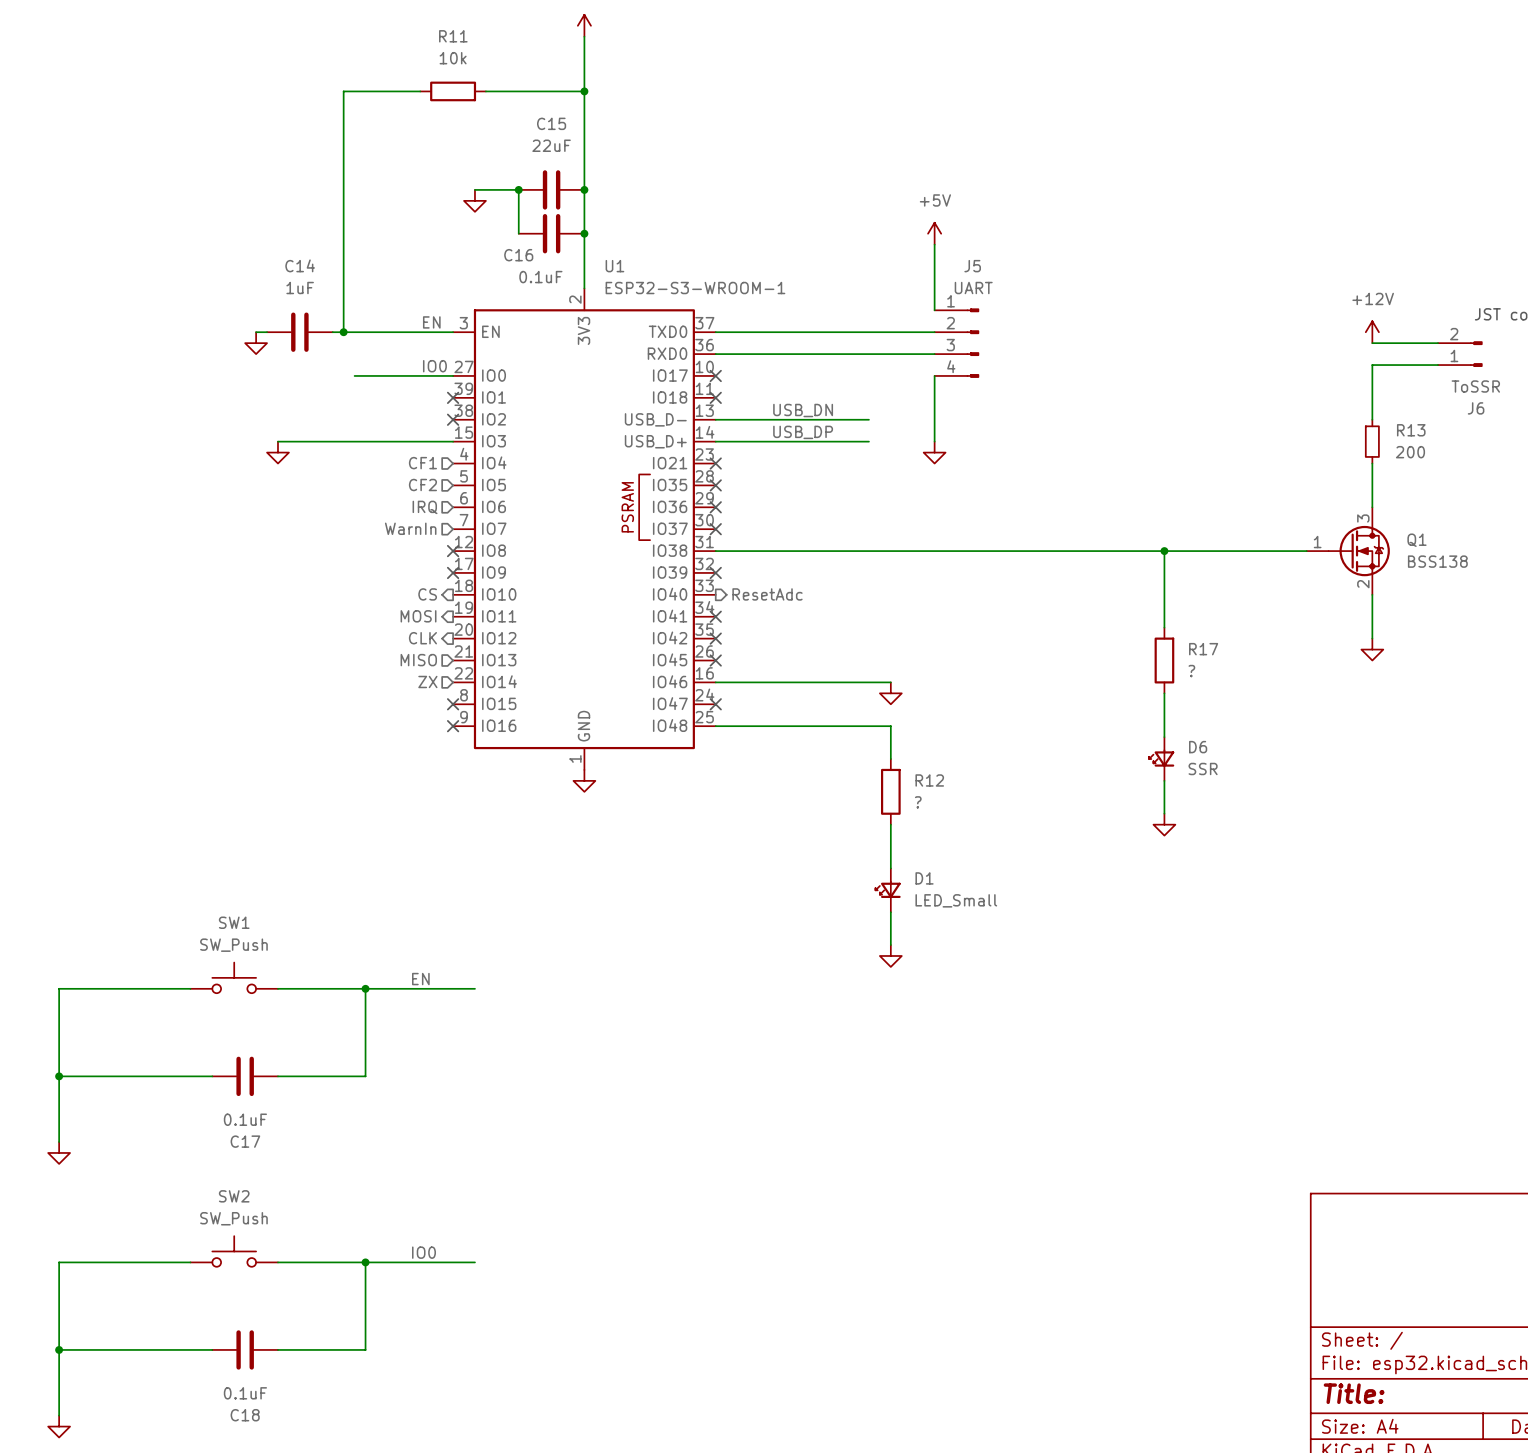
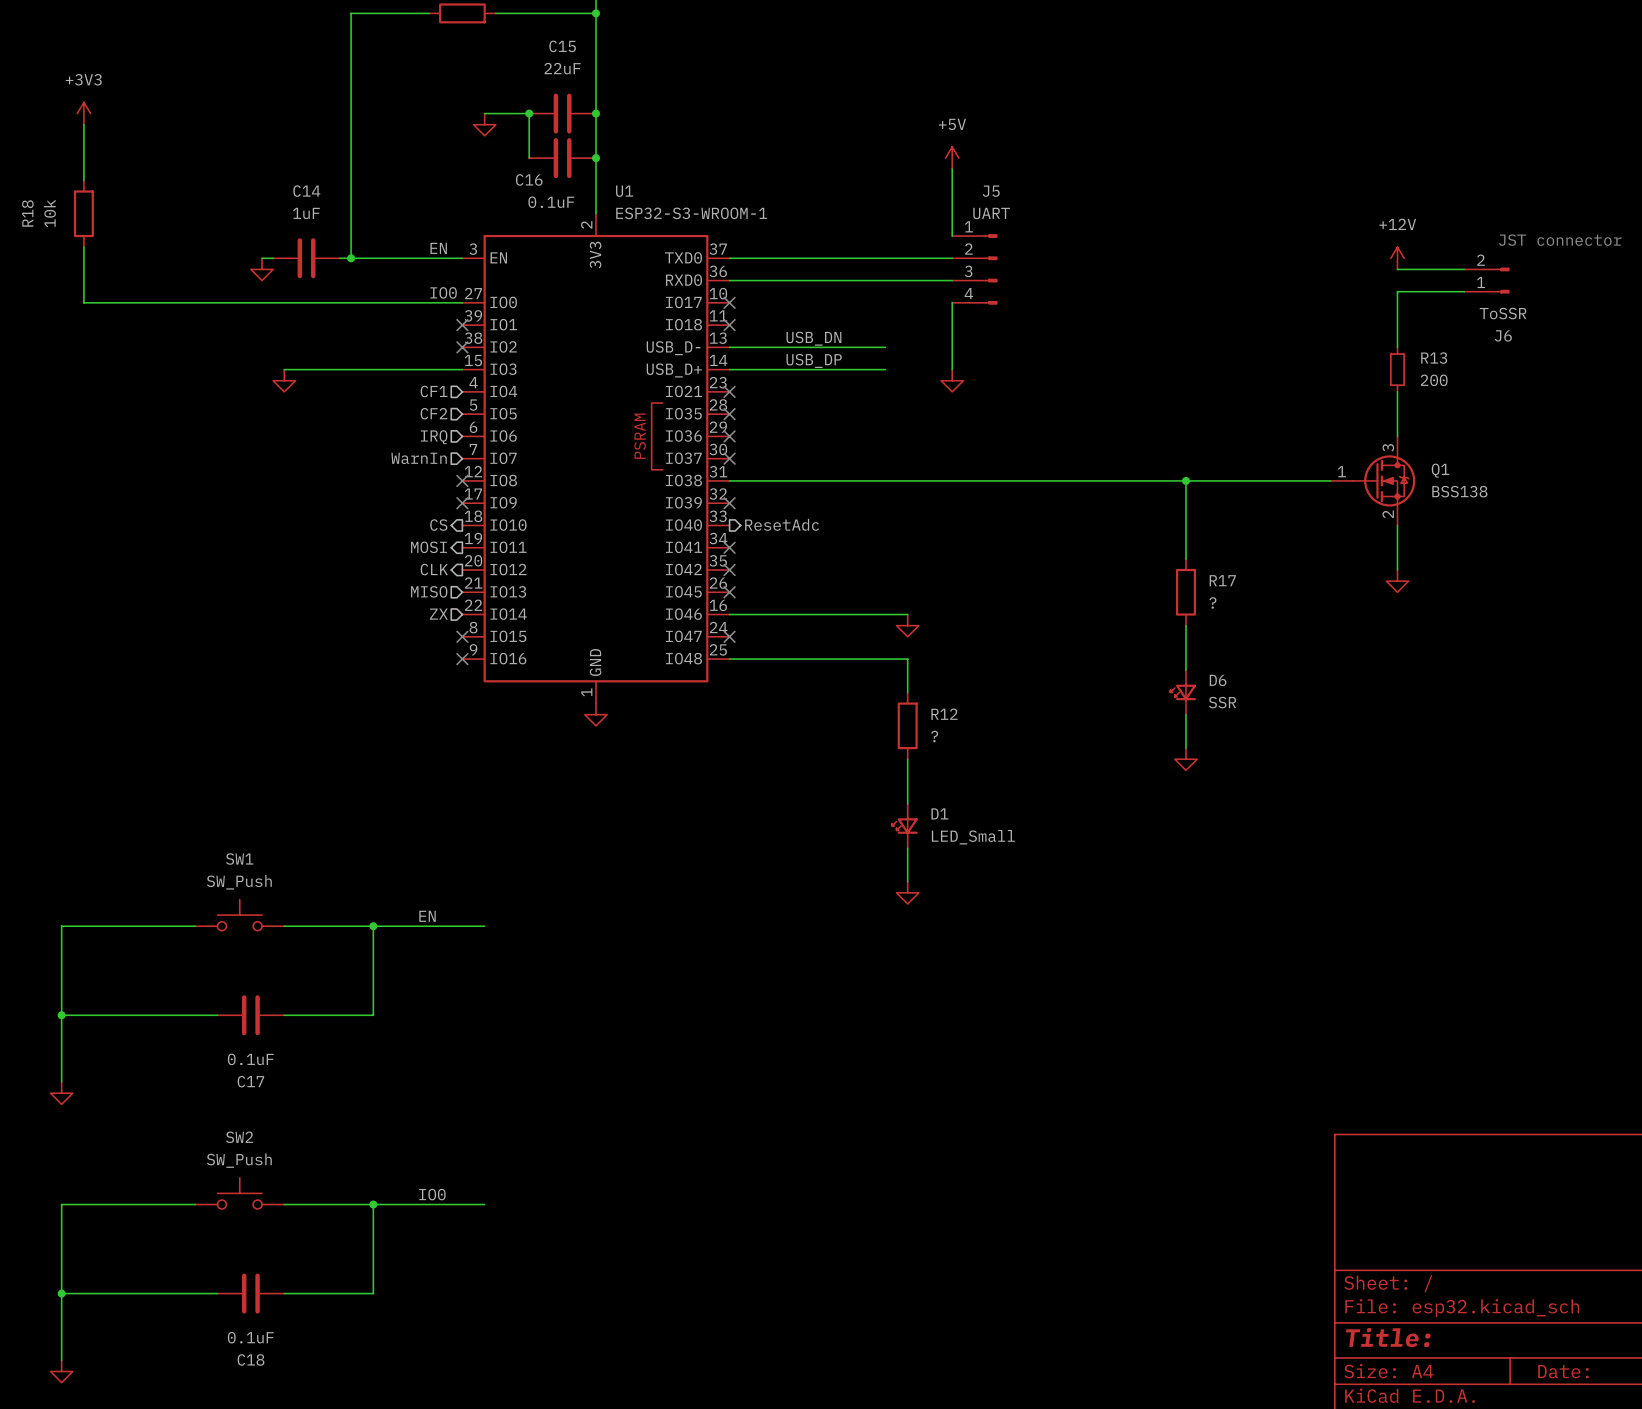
power symbol: none -> +3V3 (83, 113)
wire: none -> (83, 124) (83, 180)
R18: none -> 10k (83, 213)
wire: none -> (83, 247) (83, 302) (362, 302)

